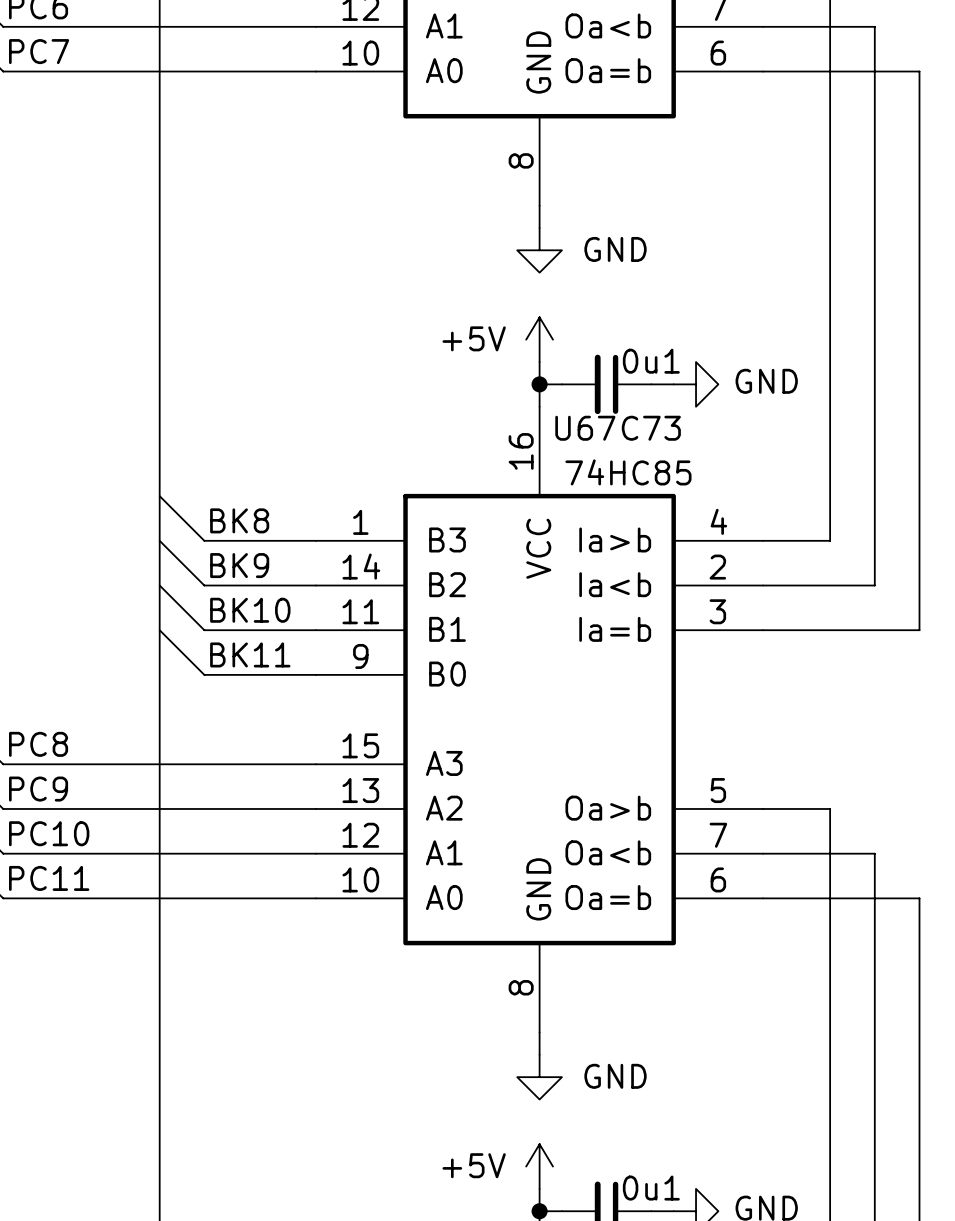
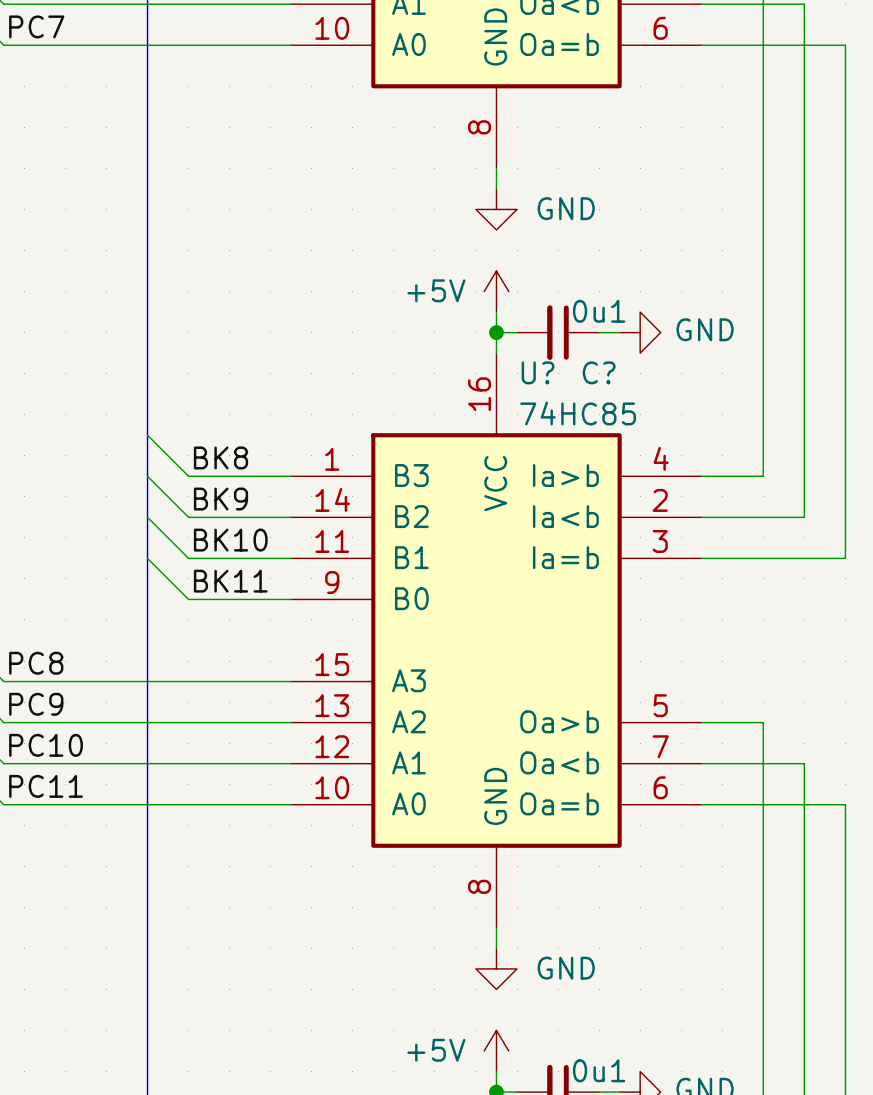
U67 name: U67 (585, 428) -> U? (538, 372)
C73 name: C73 (651, 428) -> C? (599, 372)

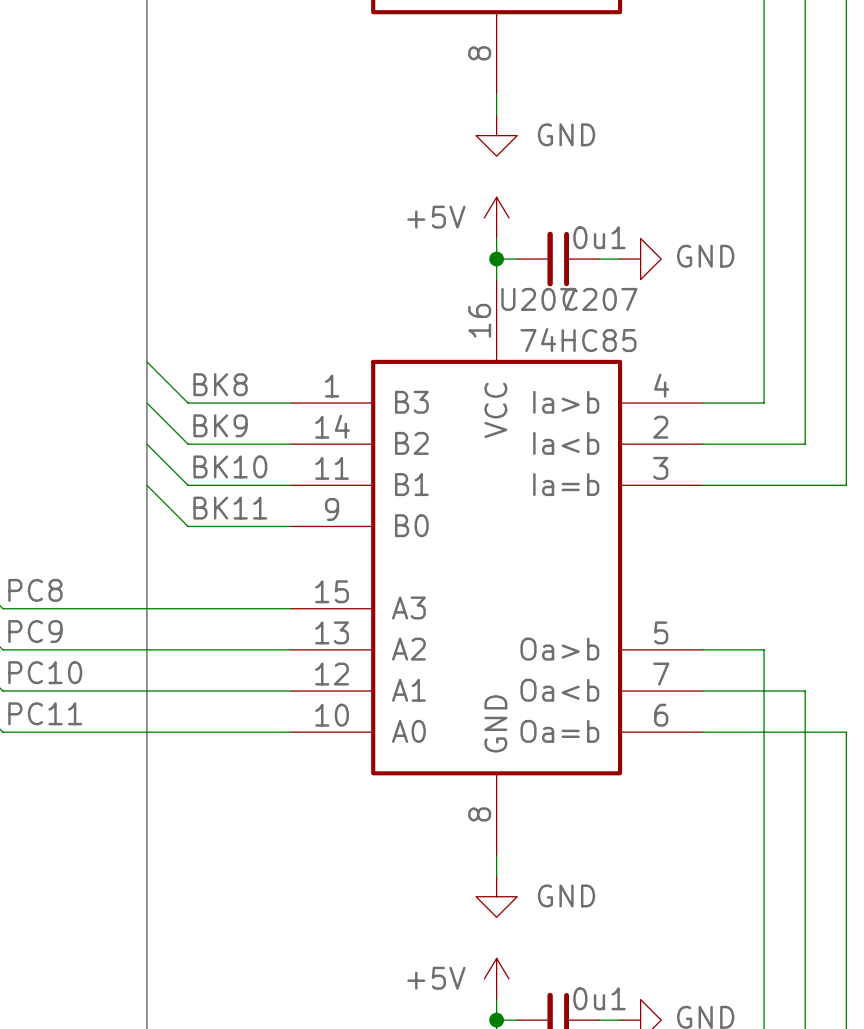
U? name: U? (538, 372) -> U207 (538, 299)
C? name: C? (599, 372) -> C207 (599, 299)

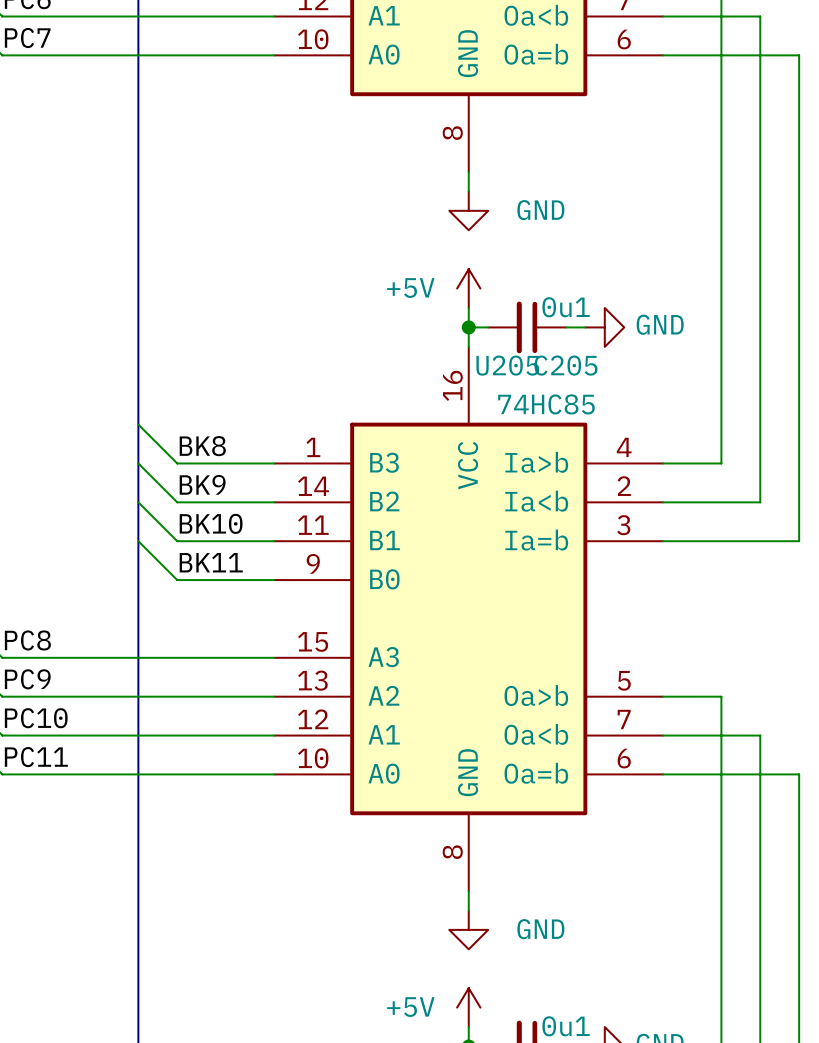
U207 name: U207 (538, 299) -> U205 (507, 365)
C207 name: C207 (599, 299) -> C205 (565, 365)

